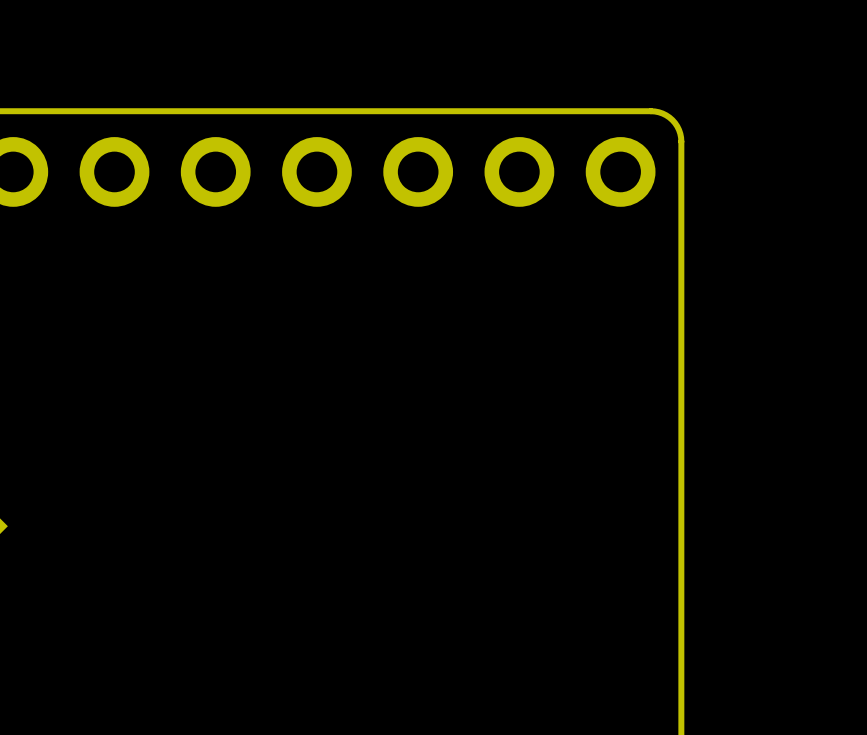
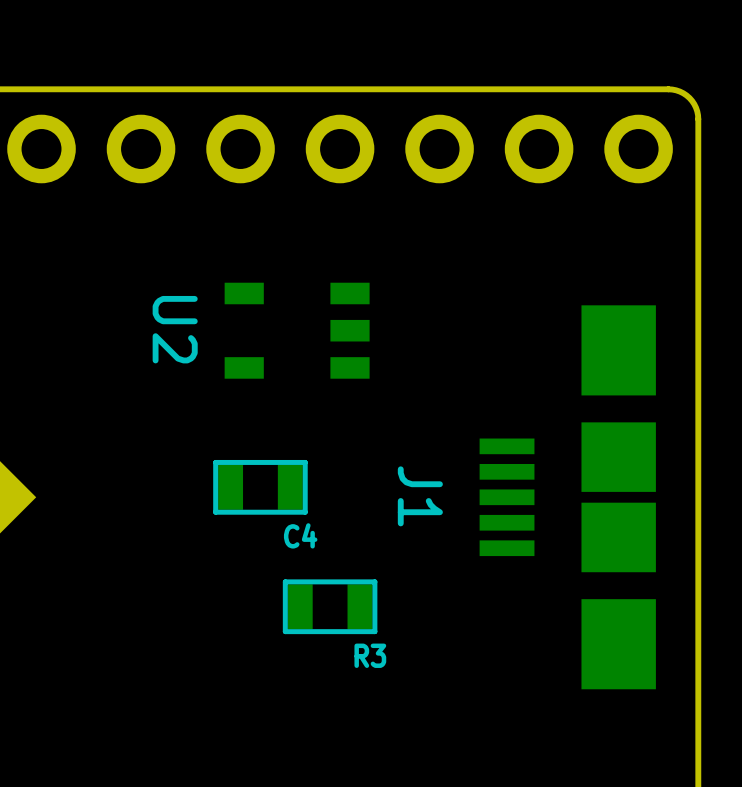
U2: none -> (297, 330)
C4: none -> (260, 487)
J1: none -> (567, 497)
R3: none -> (330, 606)

